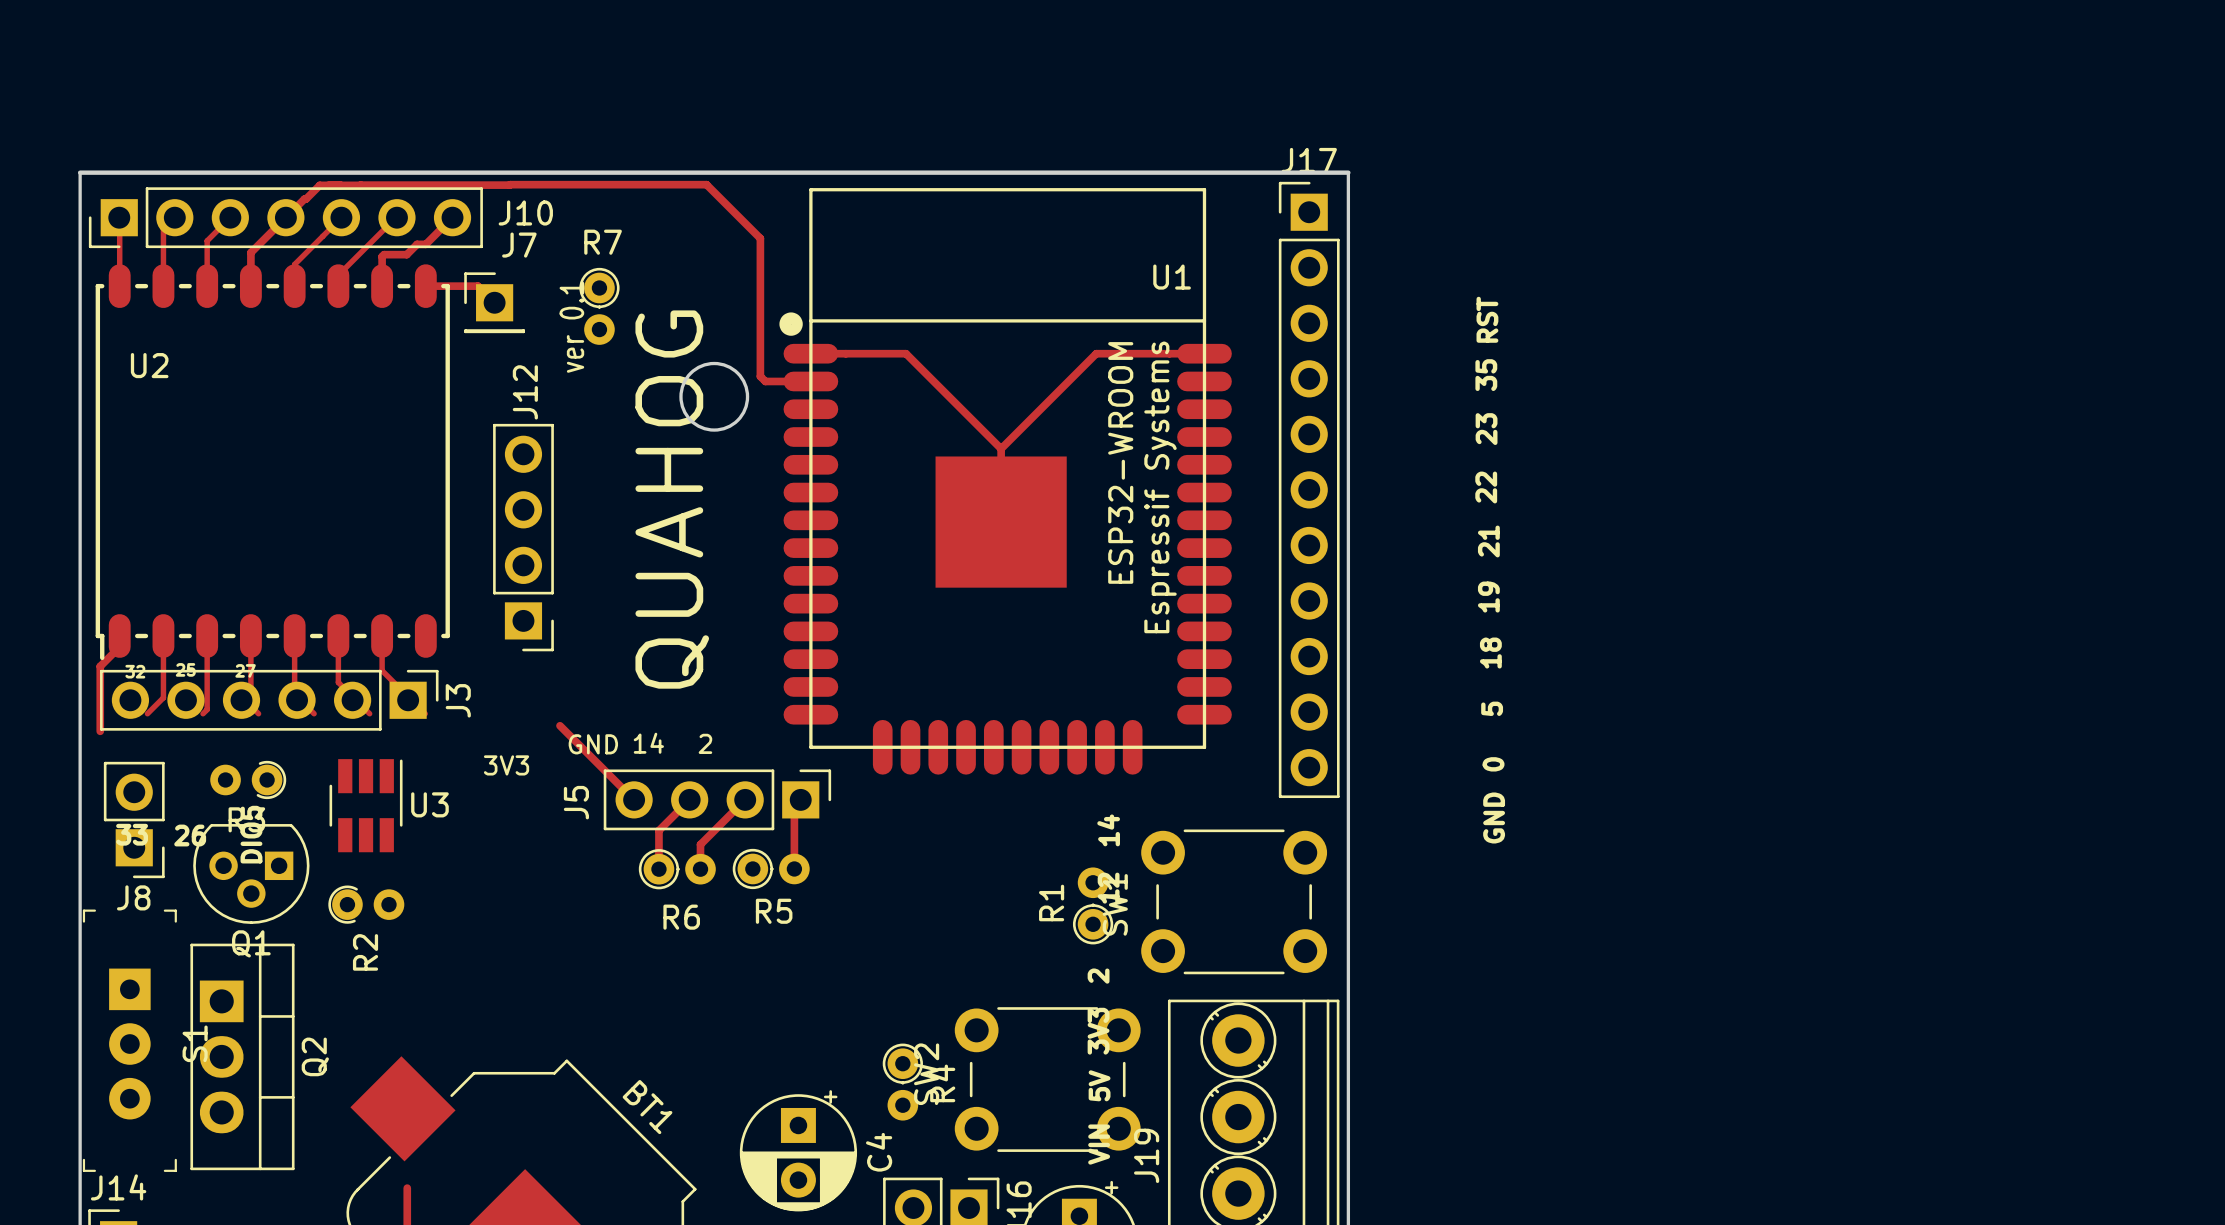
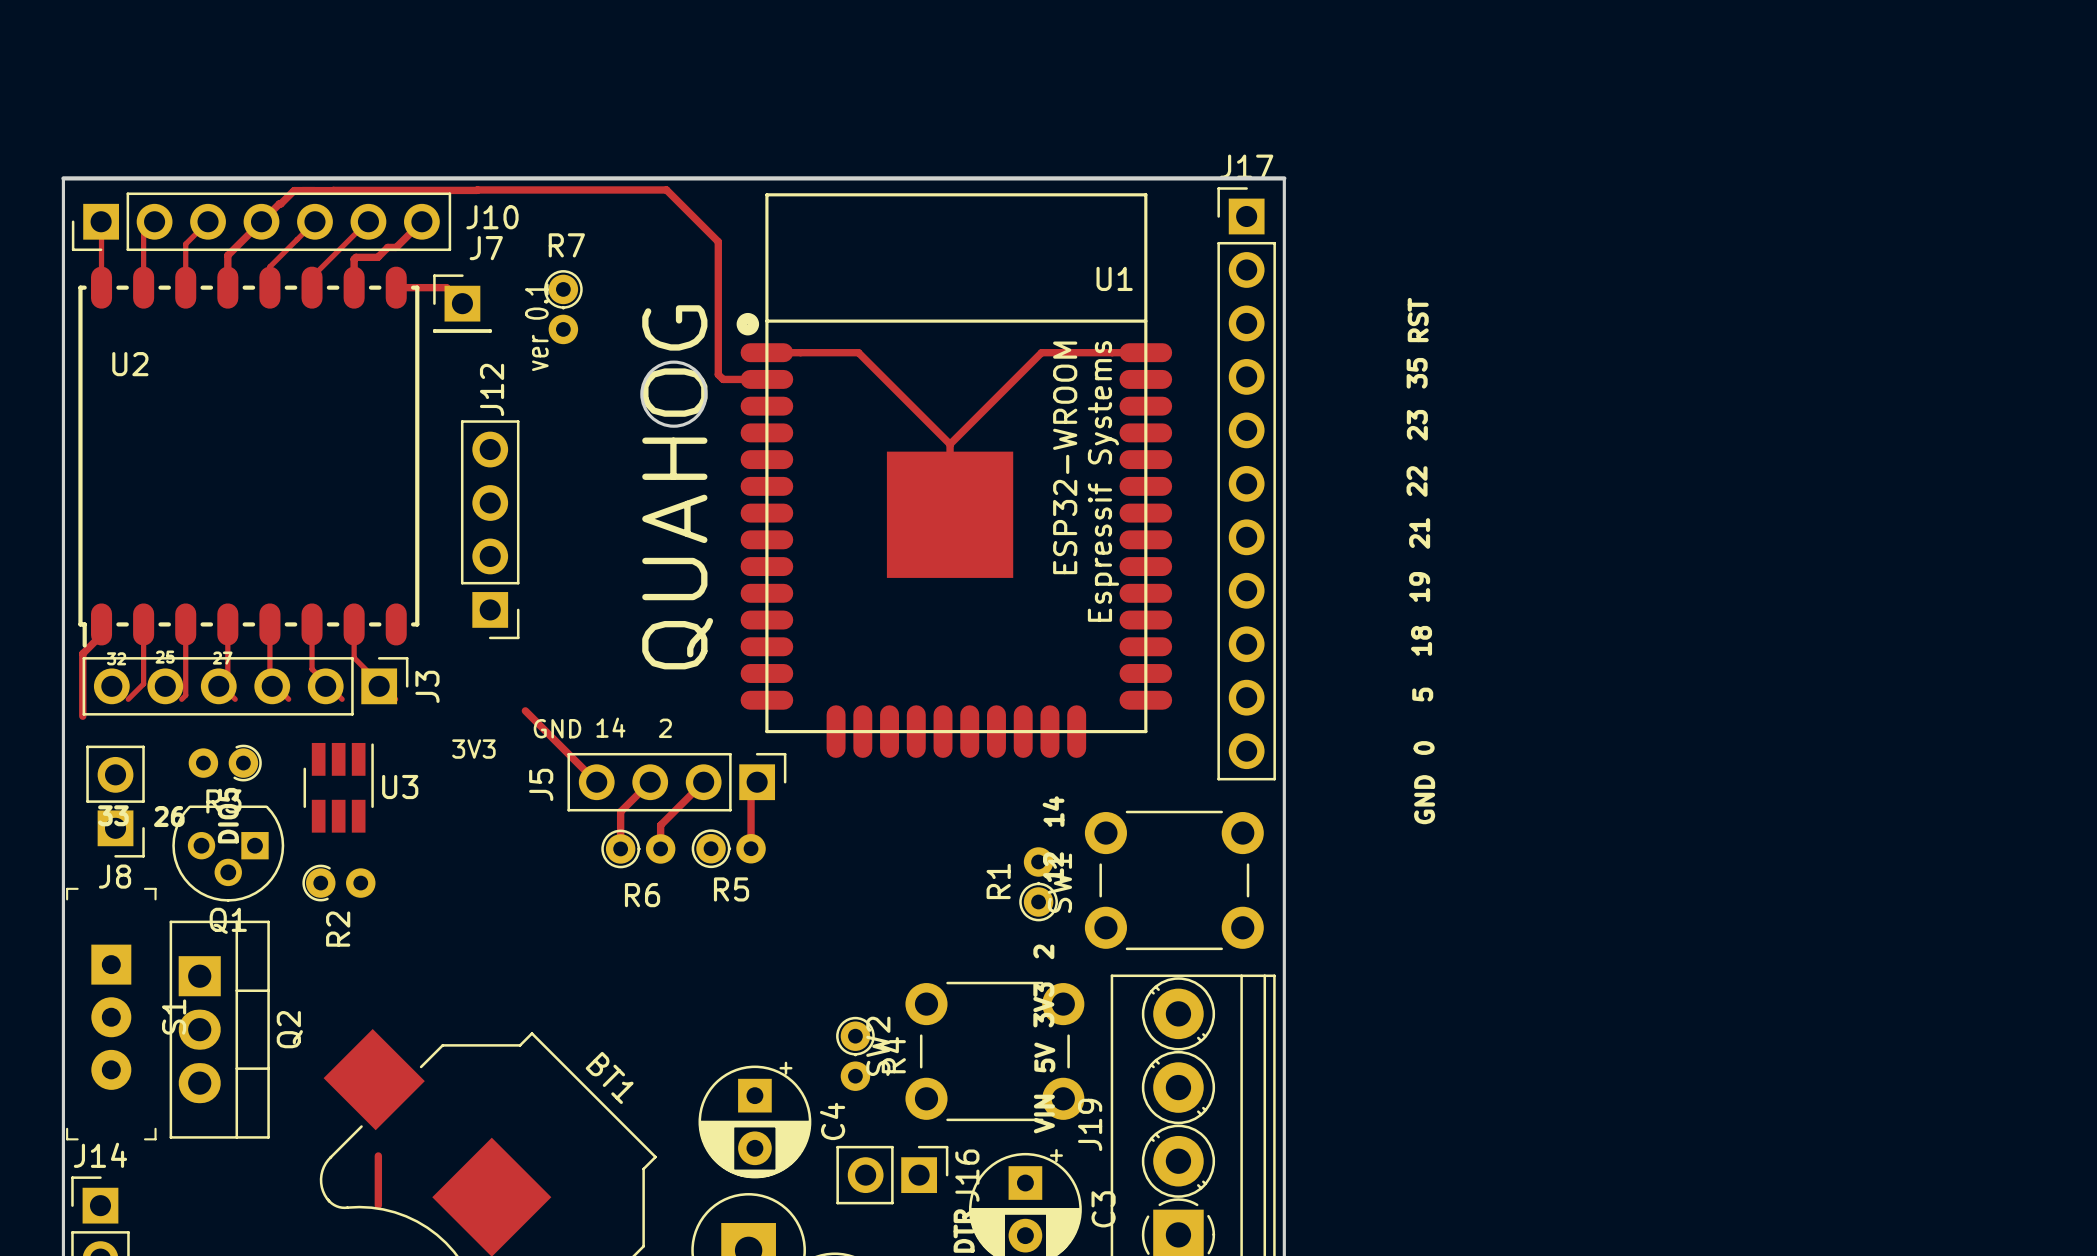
text position: QUAHOG (672, 499) -> QUAHOG (677, 487)

